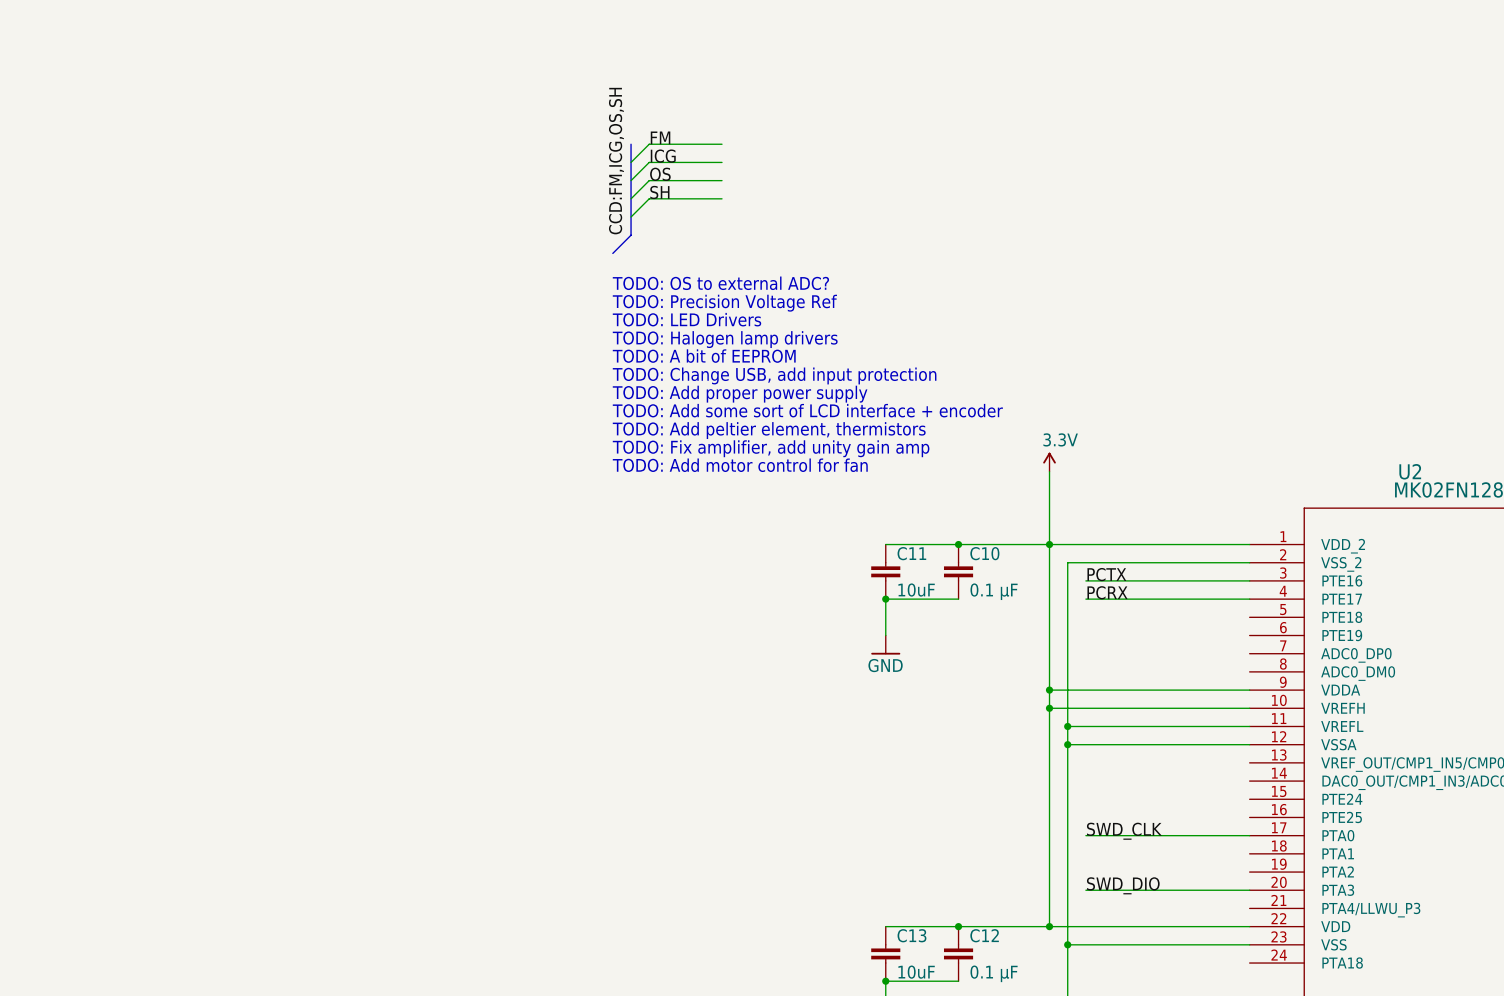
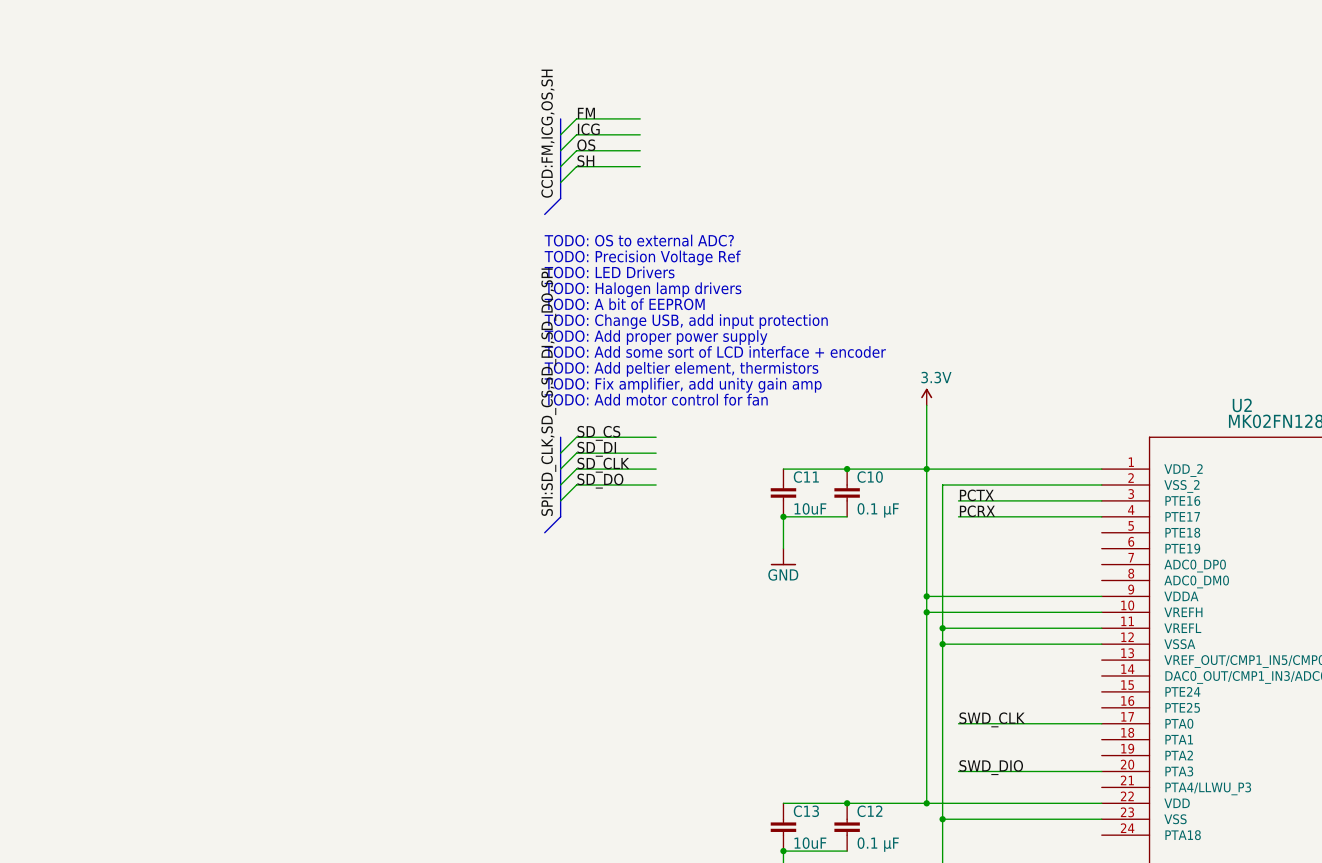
label: none -> SPI:SD_CLK,SD_CS,SD_DI,SD_DO,SPI (548, 392)
label: none -> SD_CS (598, 433)
bus: none -> (560, 437) (560, 516) (544, 532)
wire: none -> (656, 437) (576, 437) (560, 453)
label: none -> SD_DI (596, 449)
wire: none -> (656, 453) (576, 453) (560, 469)
label: none -> SD_CLK (603, 465)
wire: none -> (656, 469) (576, 469) (560, 485)
label: none -> SD_DO (600, 481)
wire: none -> (656, 485) (576, 485) (560, 500)

